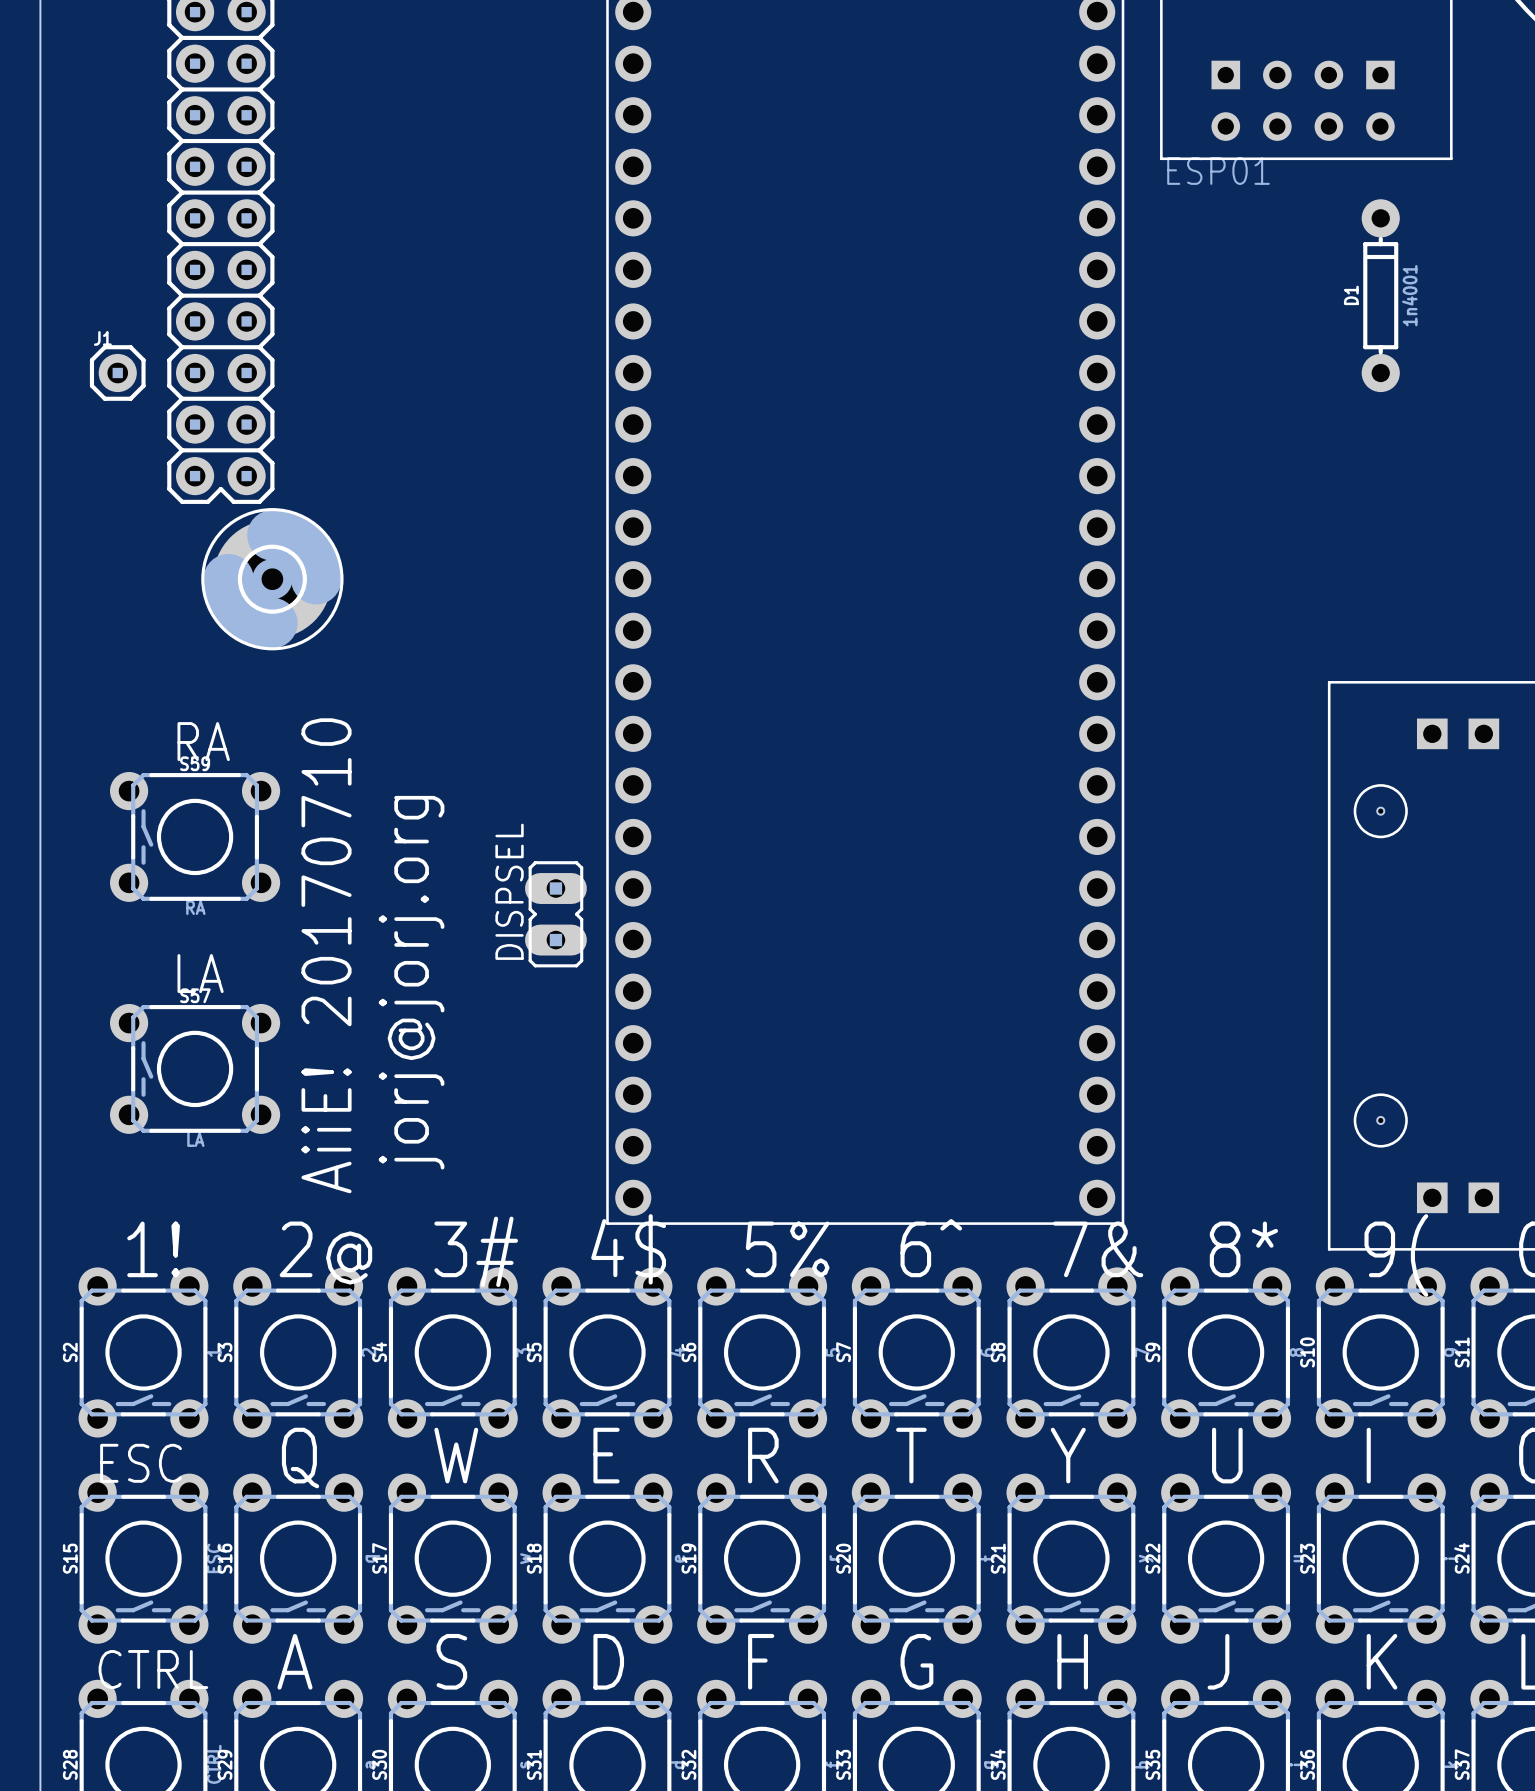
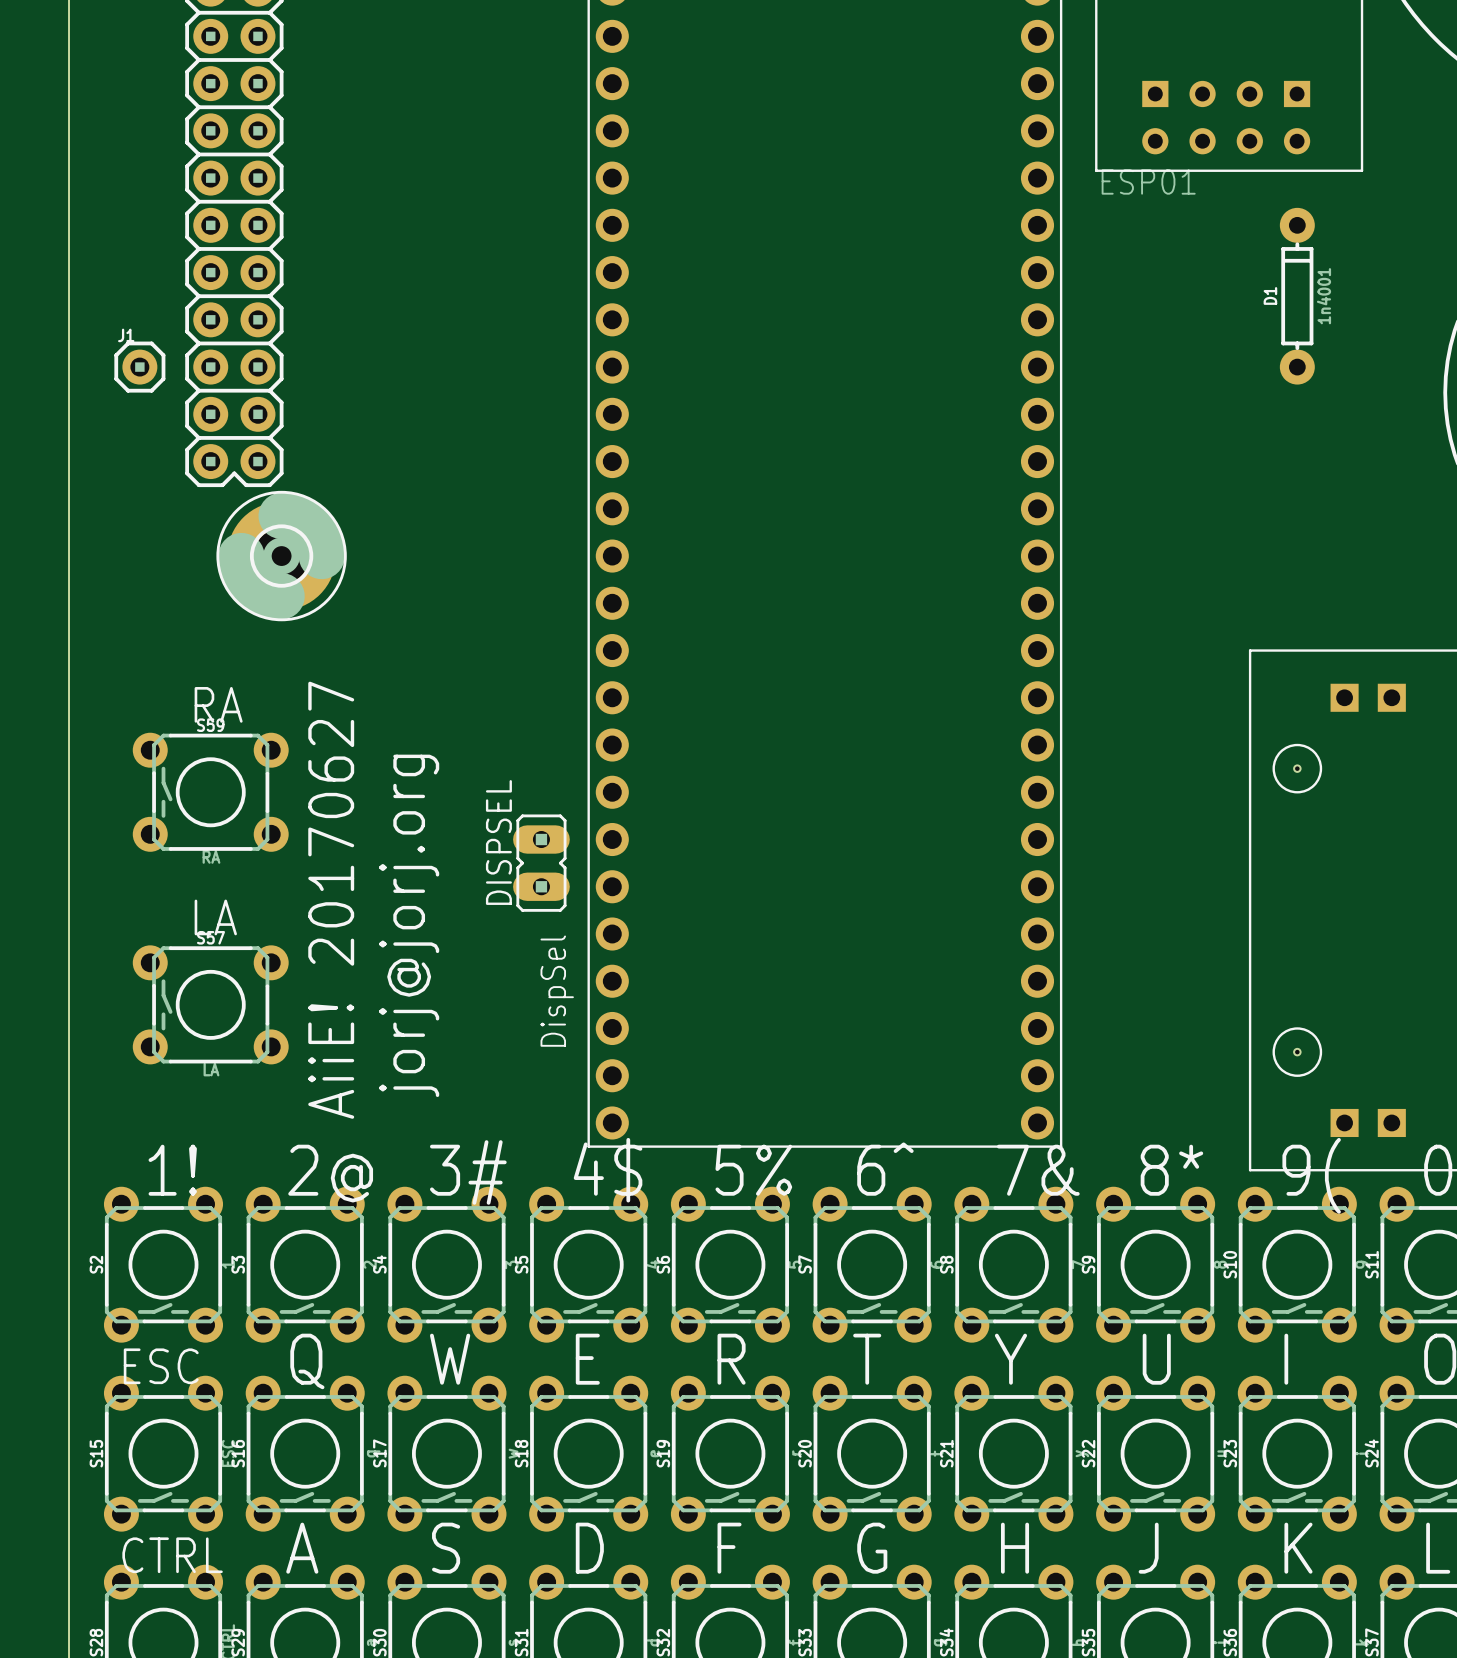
text: AiiE! 20170710 (326, 955) -> AiiE! 20170627 (331, 900)
text: none -> DispSel (557, 991)

